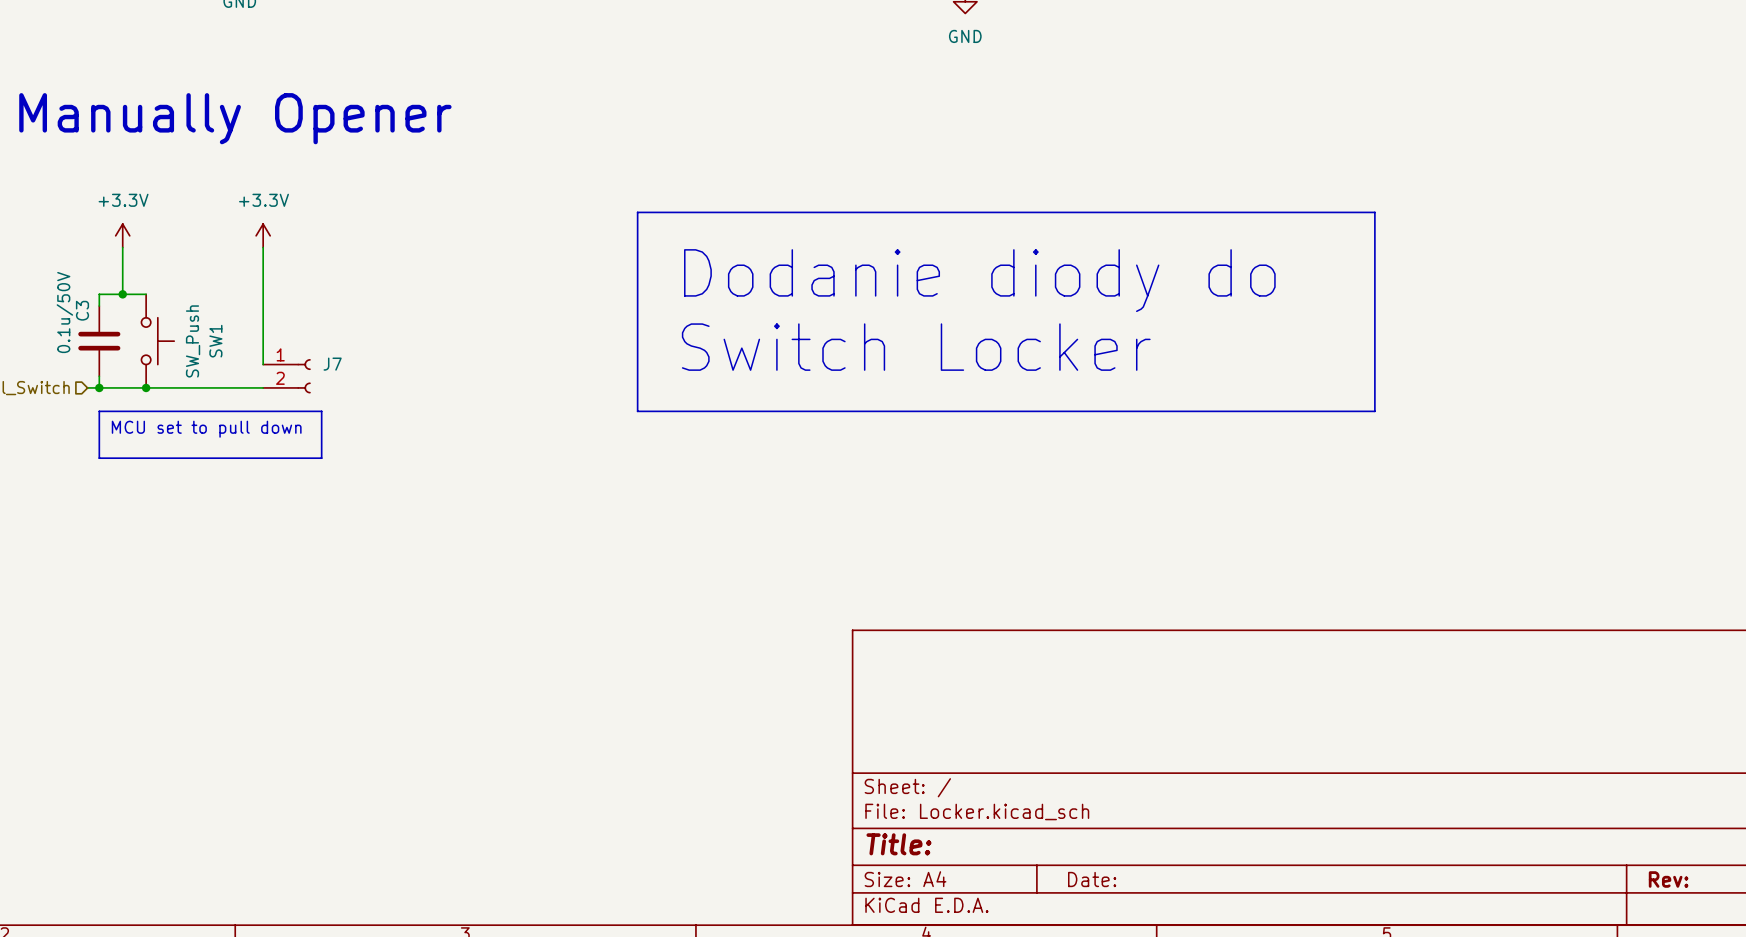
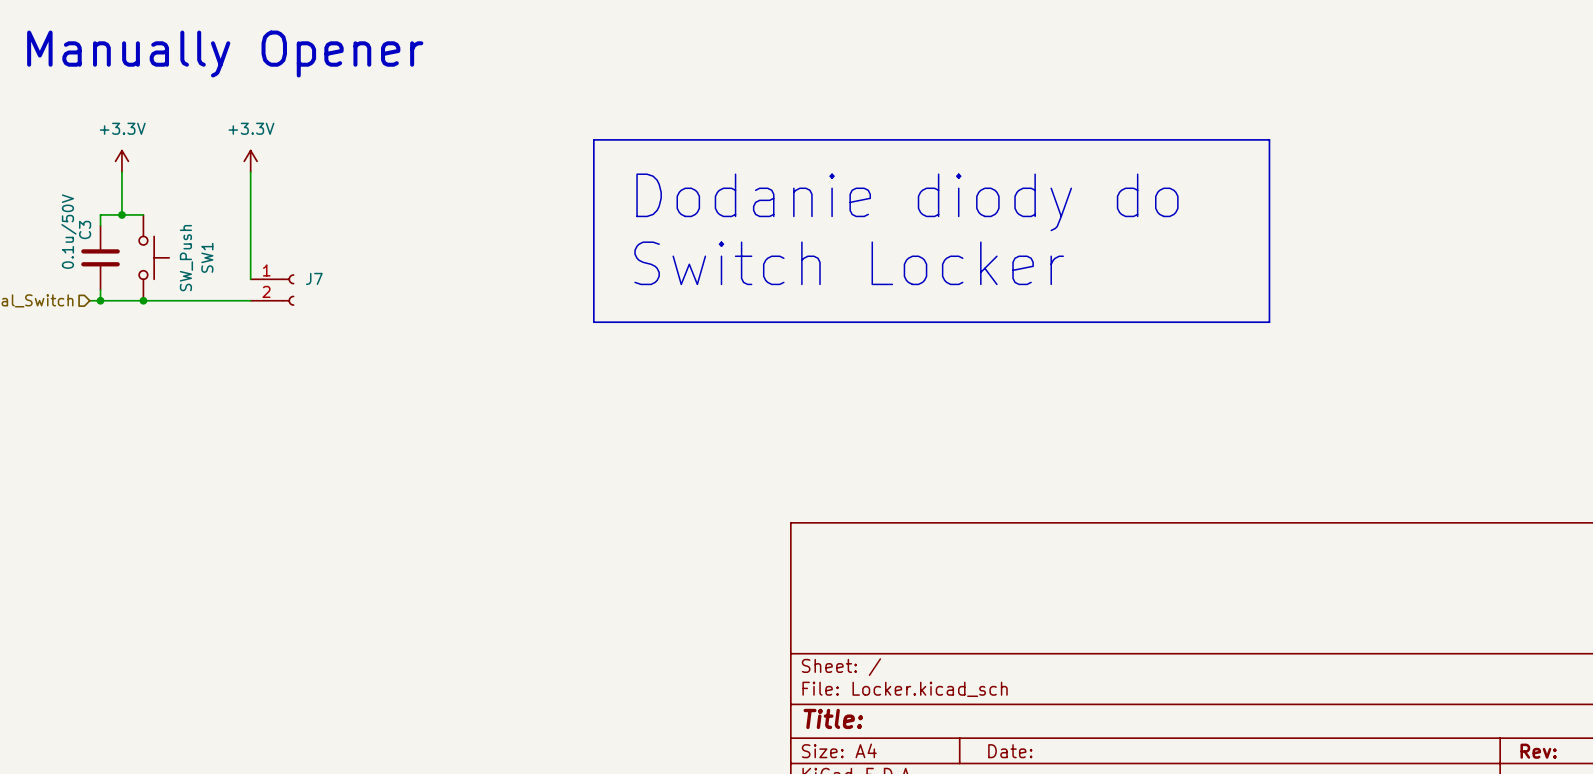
line: (99, 411) (321, 411) (321, 458) (99, 458) (99, 411) -> none
text: MCU set to pull down (206, 429) -> none

